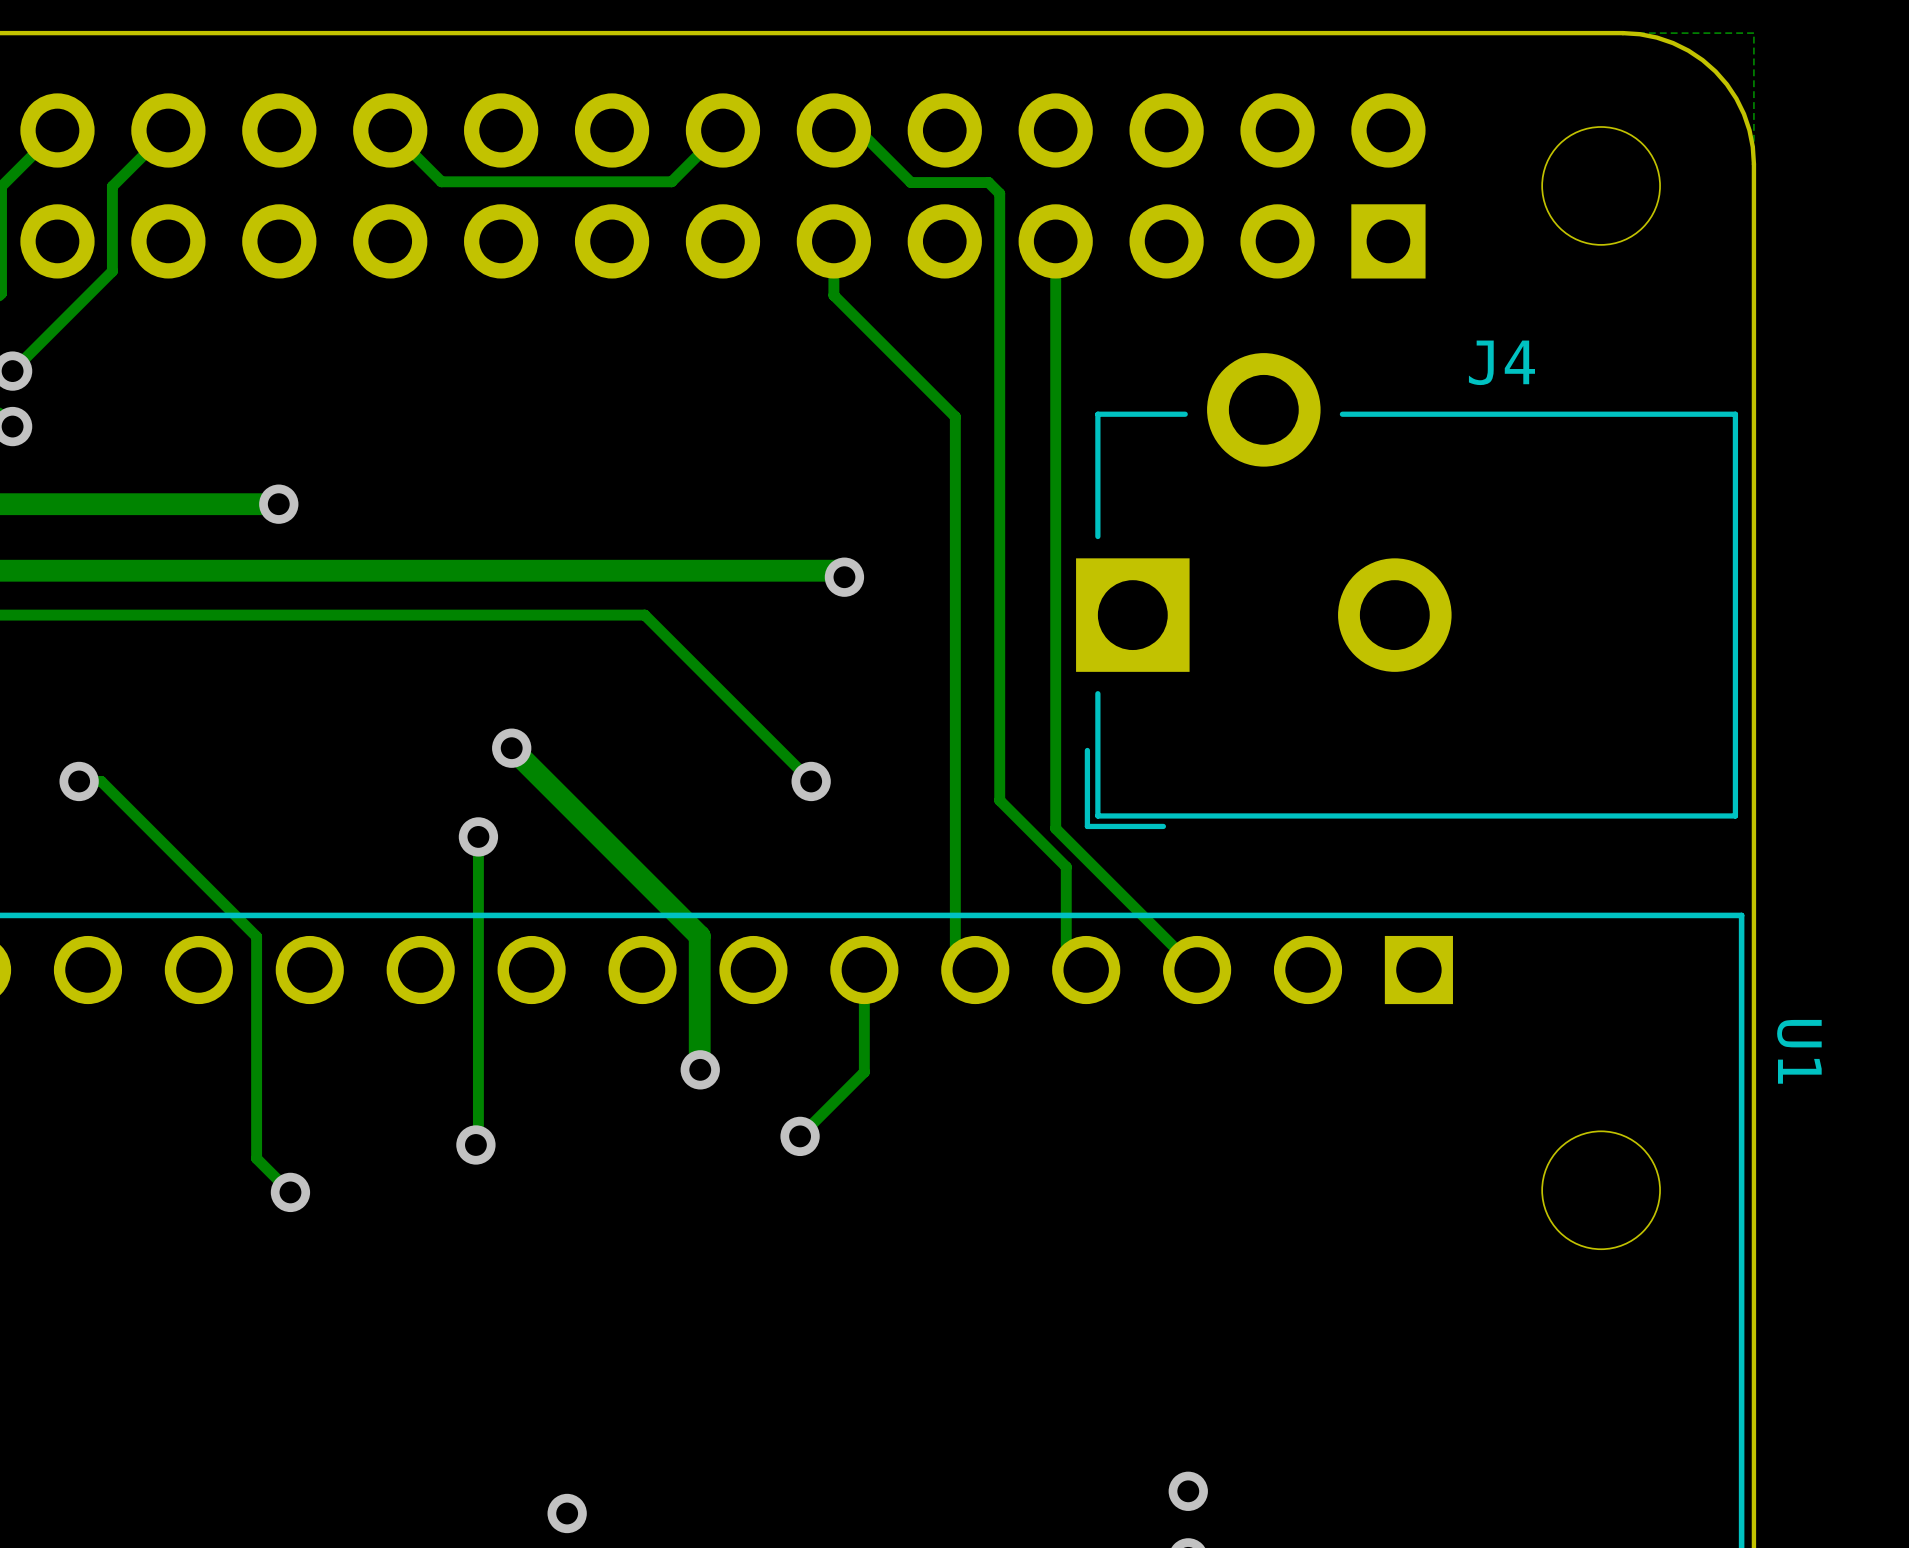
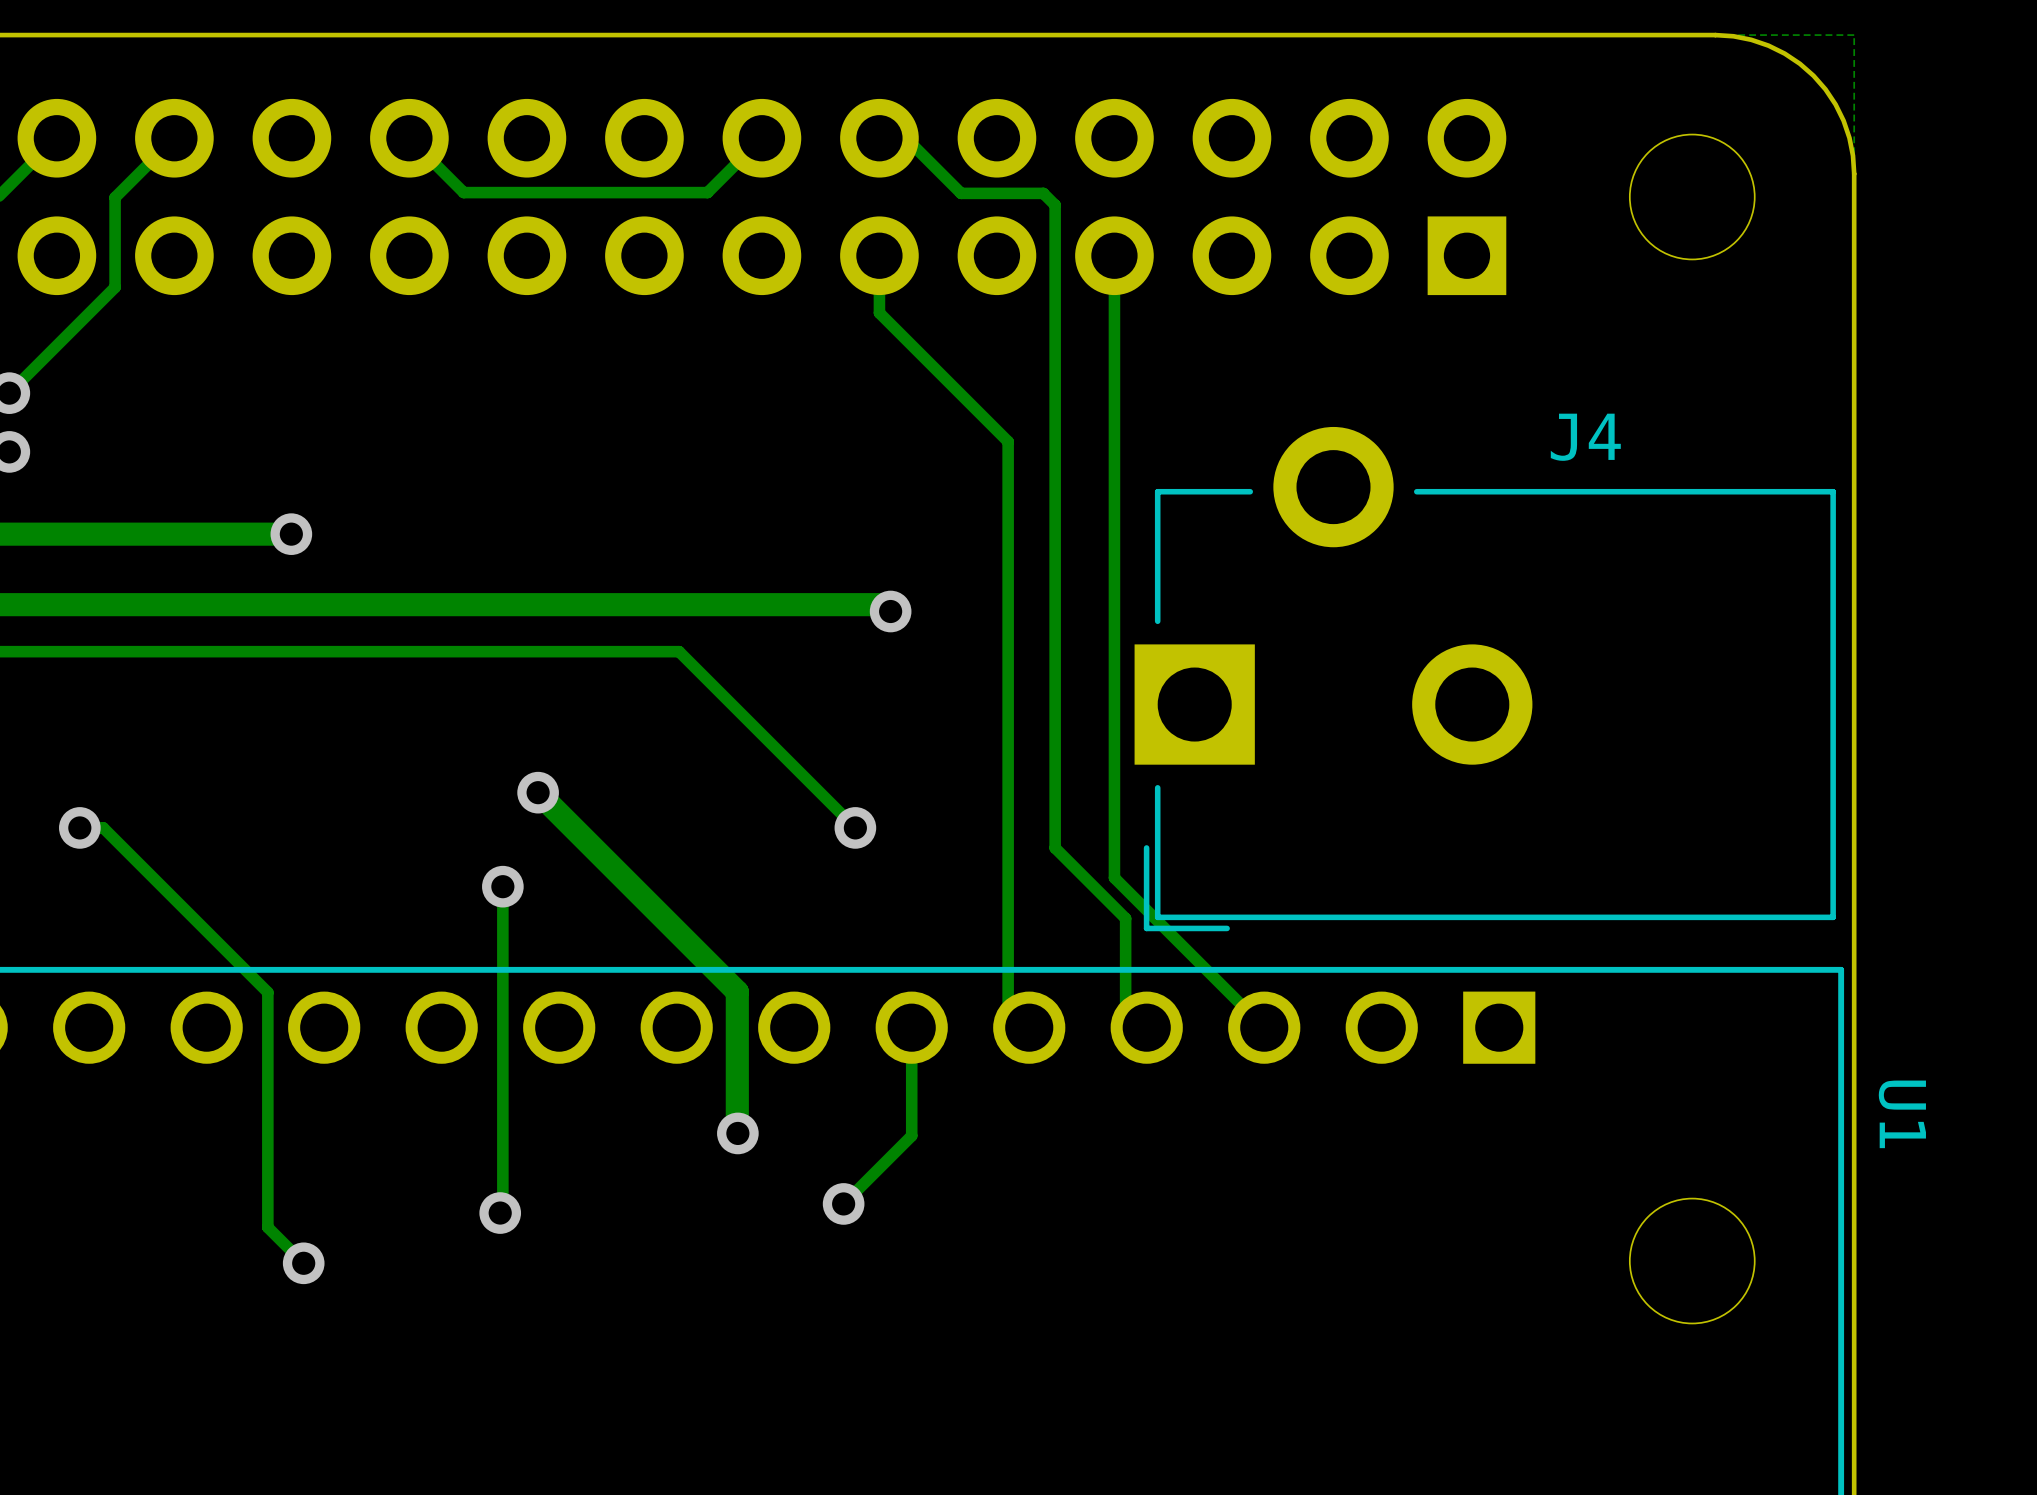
J4 position: (1407, 591) -> (1485, 679)

